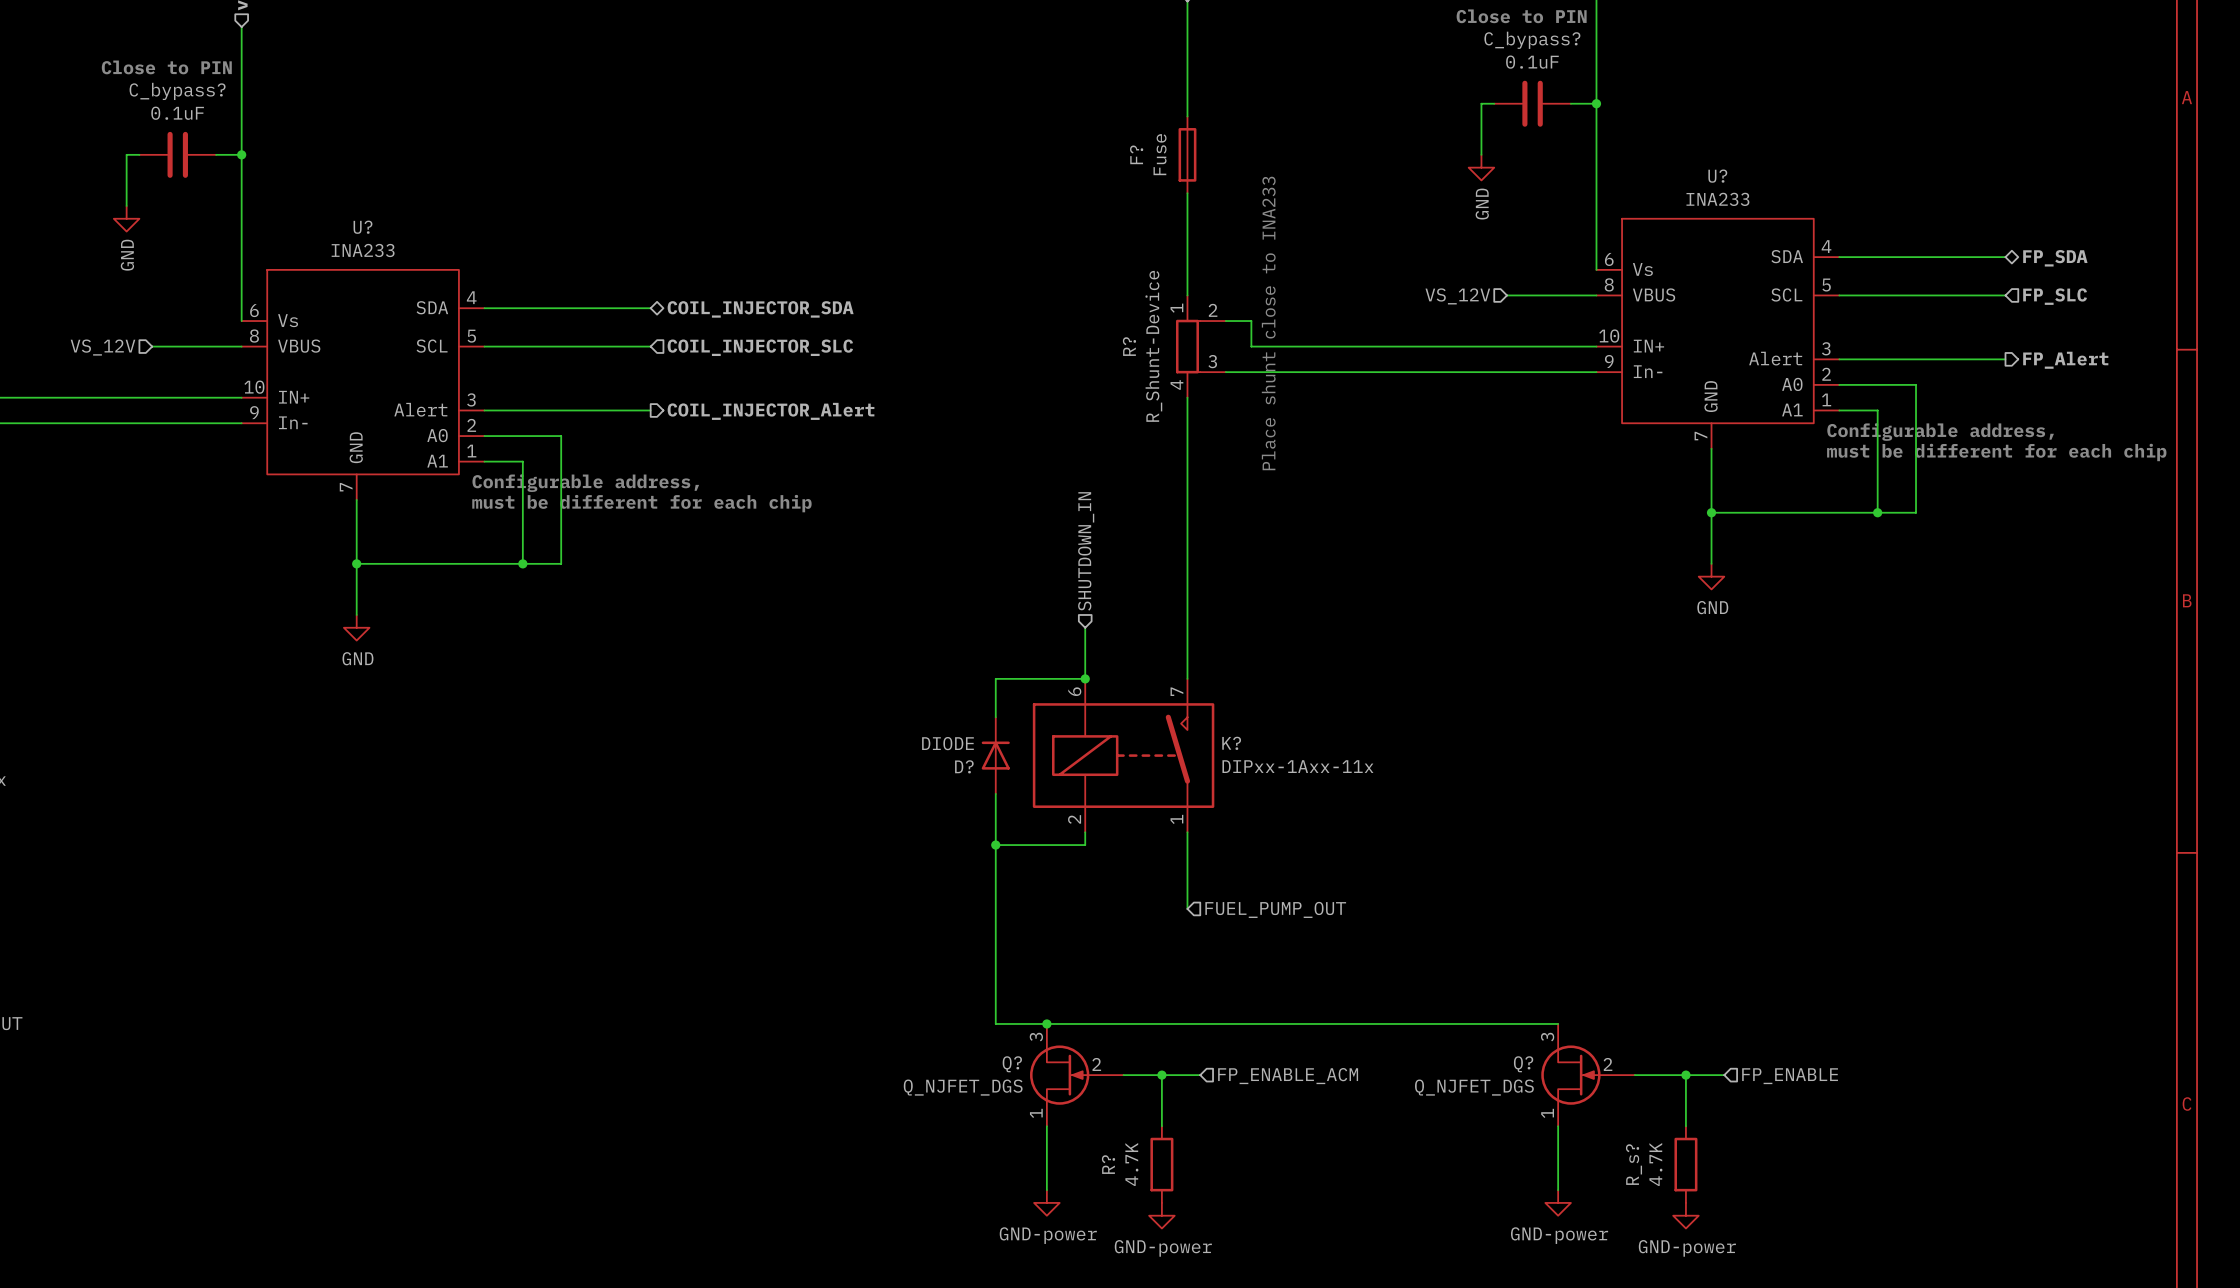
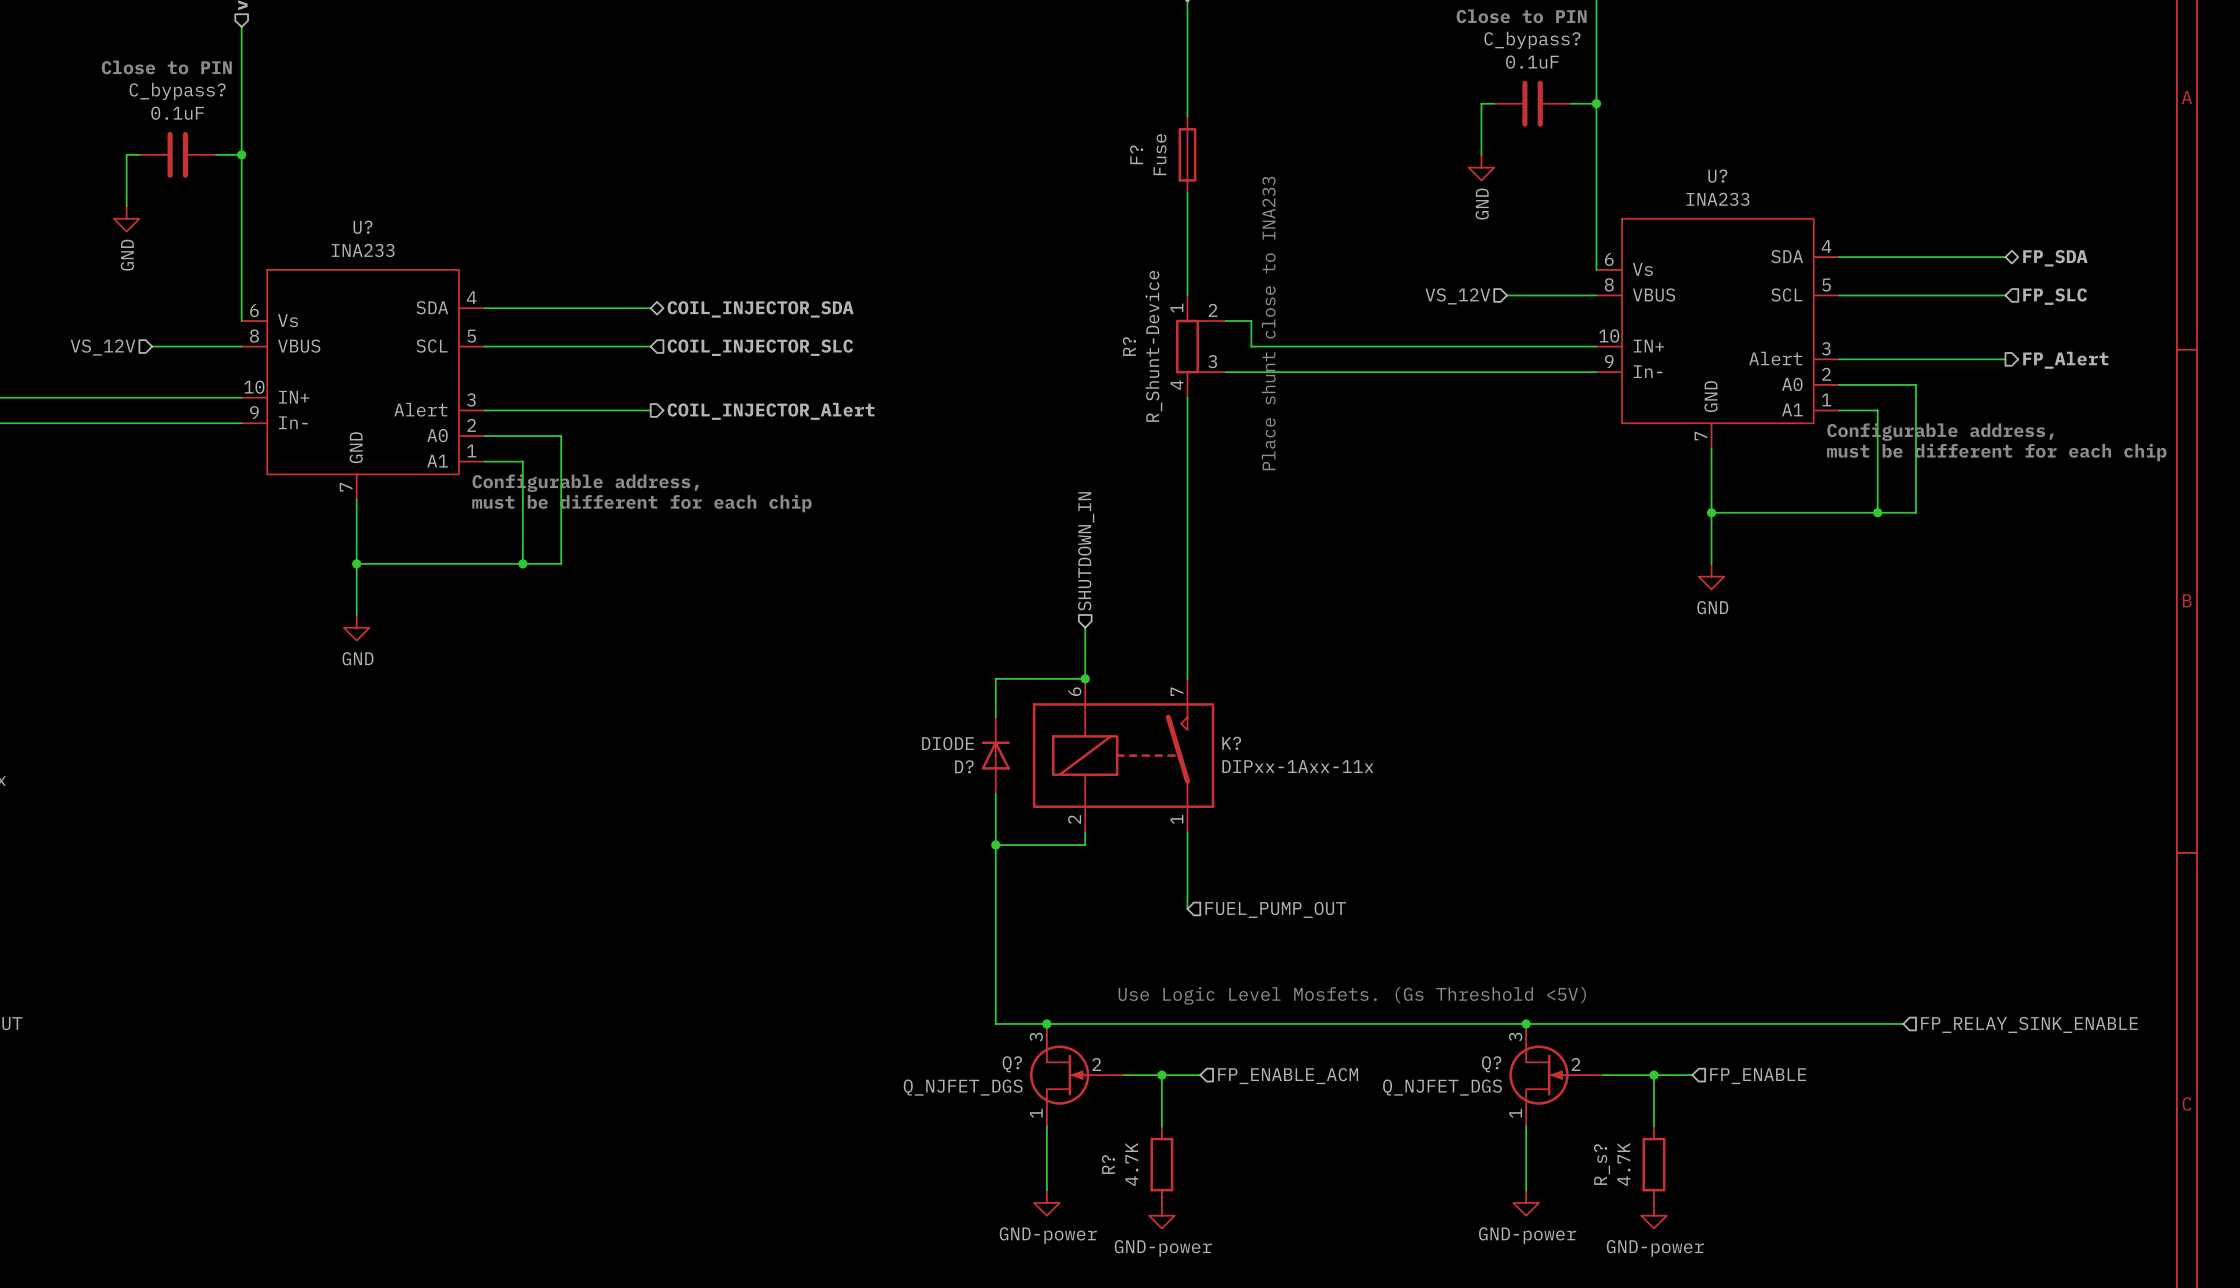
text: none -> Use Logic Level Mosfets. (Gs Threshold <5V) (1352, 995)
junction: none -> (1526, 1023)
wire: none -> (1558, 1023) (1903, 1023)
hierarchical label: none -> FP_RELAY_SINK_ENABLE (2029, 1024)
Q? position: (1588, 1075) -> (1556, 1075)
wire: (1685, 1075) (1685, 1126) -> (1654, 1075) (1654, 1126)
junction position: (1685, 1075) -> (1654, 1075)
hierarchical label position: FP_ENABLE (1790, 1076) -> FP_ENABLE (1758, 1076)
wire: (1558, 1126) (1558, 1190) -> (1526, 1126) (1526, 1190)
R_s? position: (1685, 1164) -> (1654, 1164)
power symbol position: GND-power (1558, 1202) -> GND-power (1526, 1202)
power symbol position: GND-power (1685, 1215) -> GND-power (1654, 1215)

